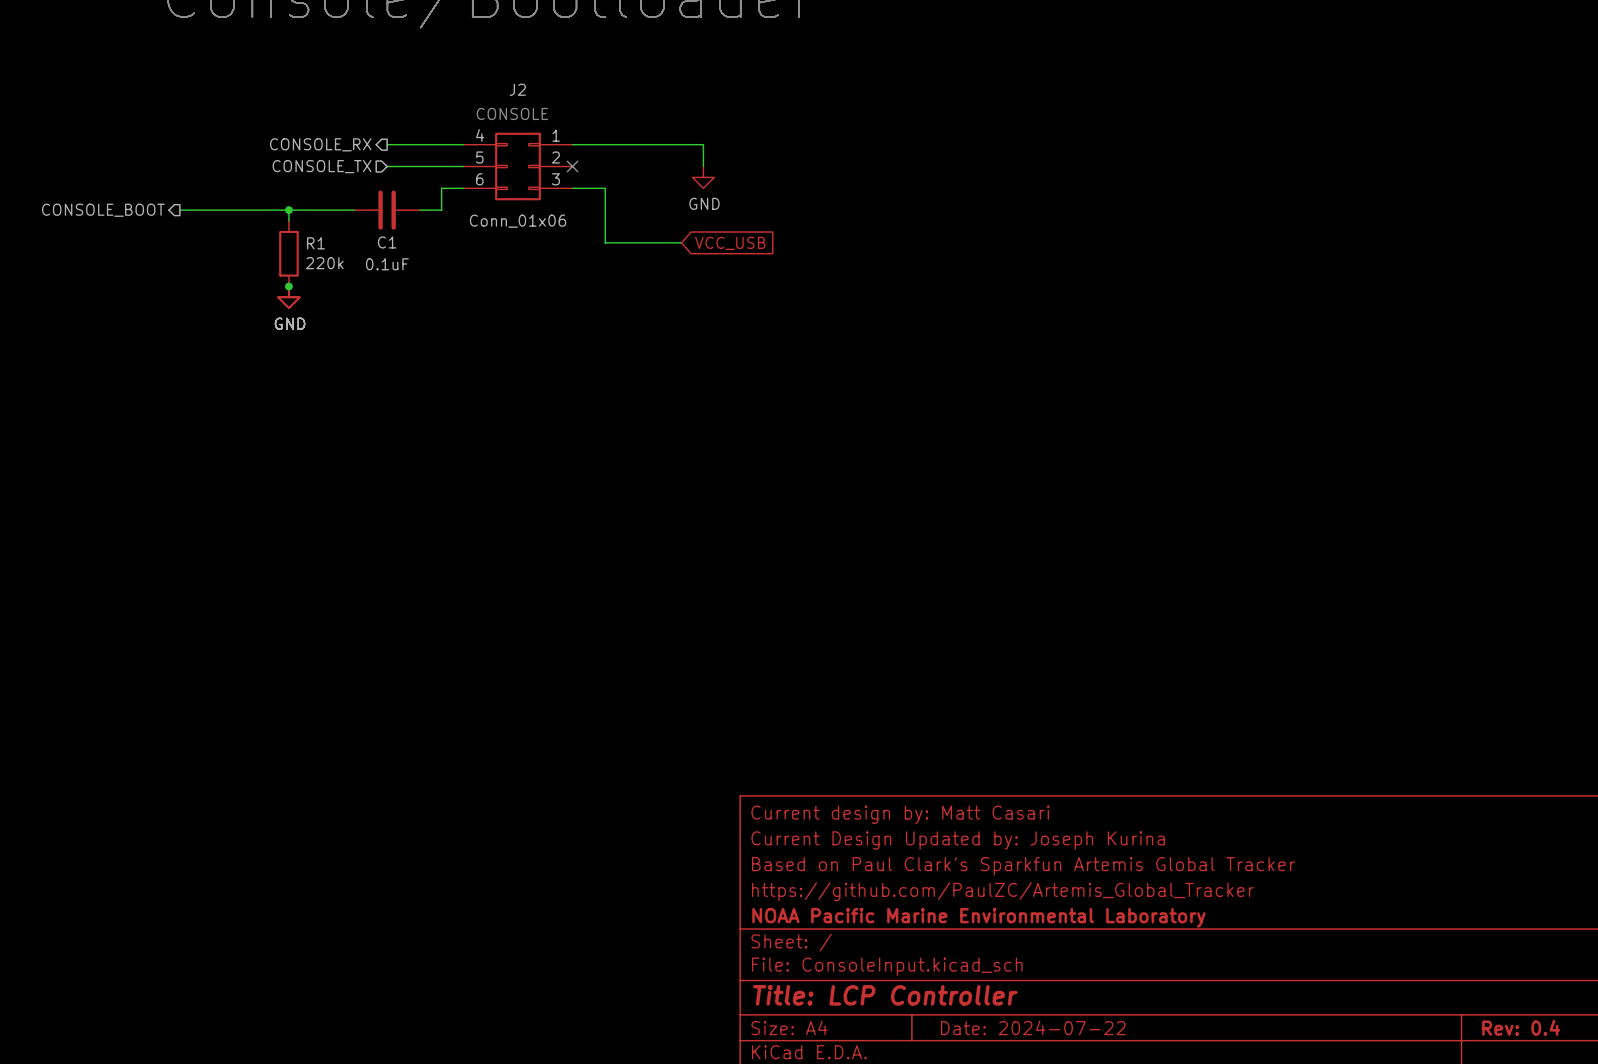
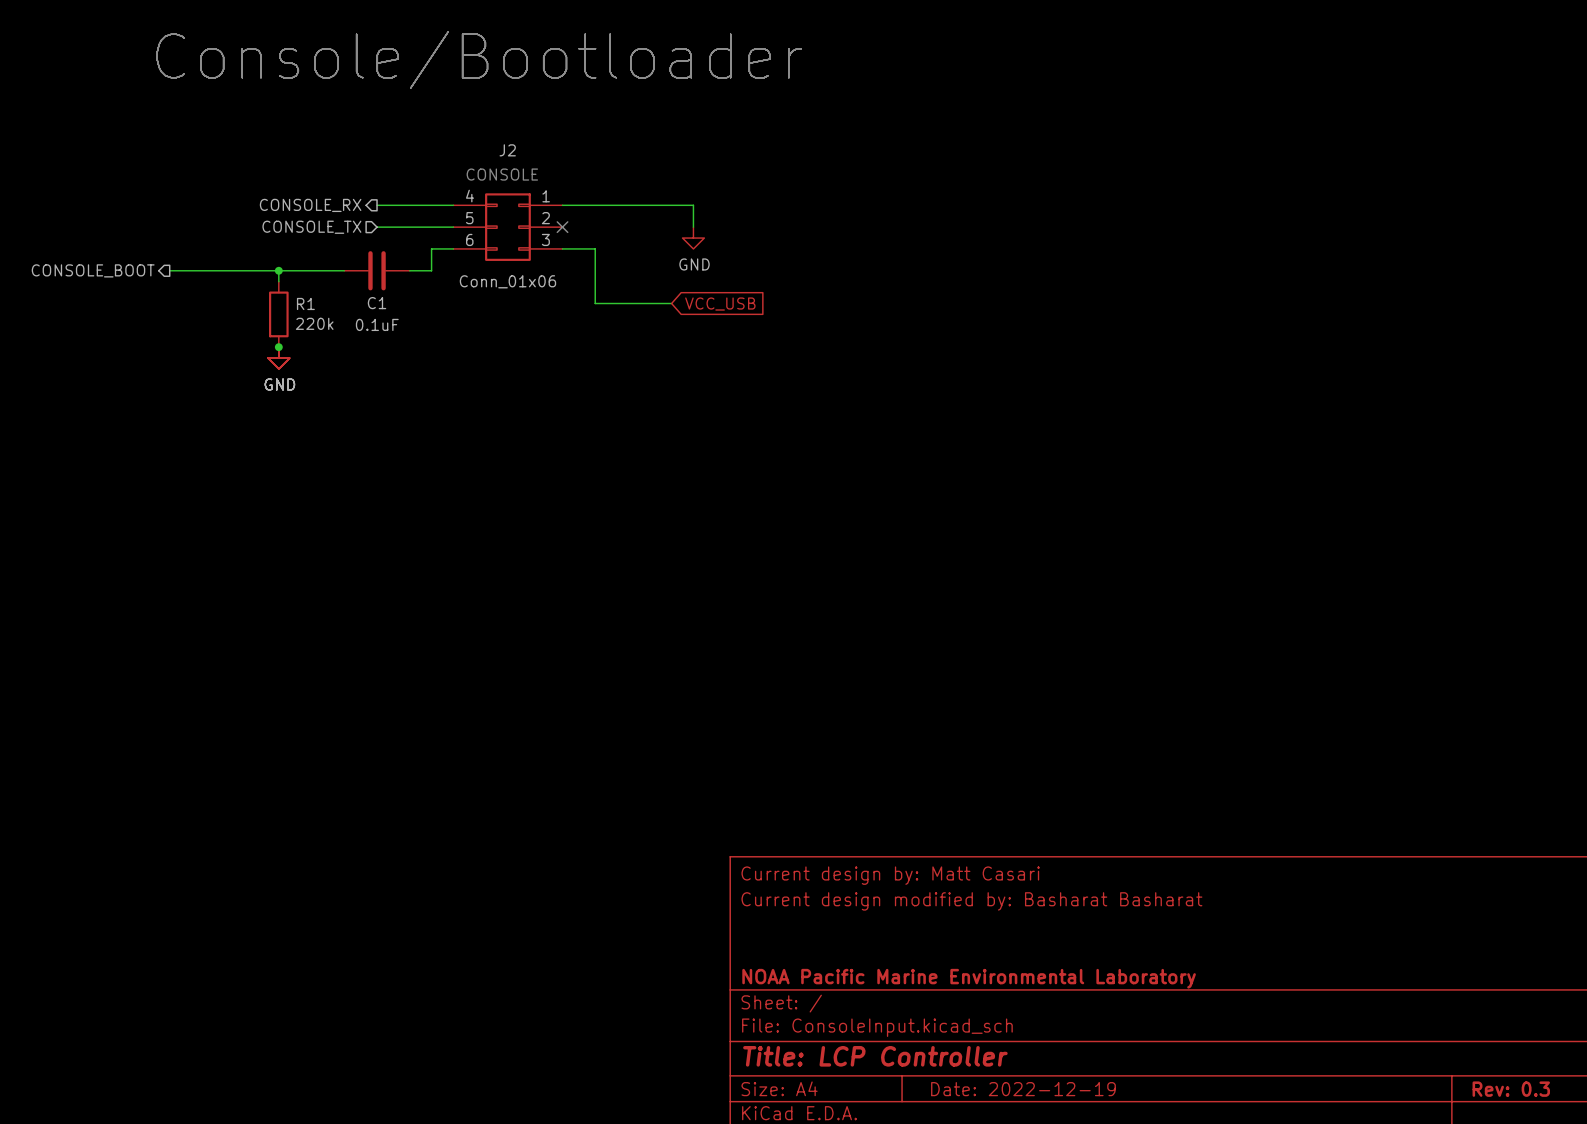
title block: Current Design Updated by: Joseph Kurina (958, 840) -> Current design modified by: Basharat Basharat (971, 901)
title block: Based on Paul Clark's Sparkfun Artemis Global Tracker (1023, 866) -> none
title block: https://github.com/PaulZC/Artemis_Global_Tracker (1002, 891) -> none
title block: Date: 2024-07-22 (1033, 1027) -> Date: 2022-12-19 (1023, 1089)
title block: Rev: 0.4 (1521, 1027) -> Rev: 0.3 (1511, 1089)

